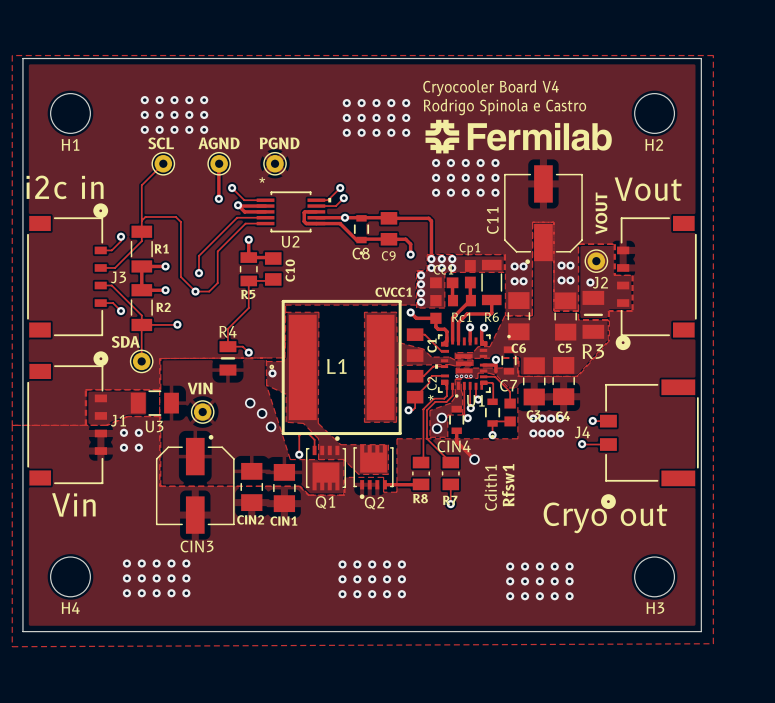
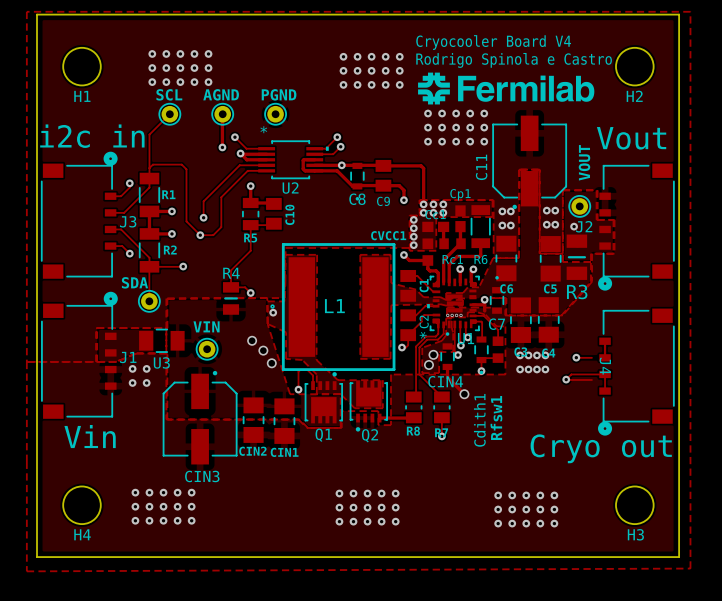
J4 footprint: [599, 379, 699, 510] -> [598, 308, 675, 436]
track: none -> (605, 341) (605, 357)
J4 name position: J4 (582, 432) -> J4 (605, 366)
track: none -> (566, 379) (571, 374) (605, 374) (605, 391)

